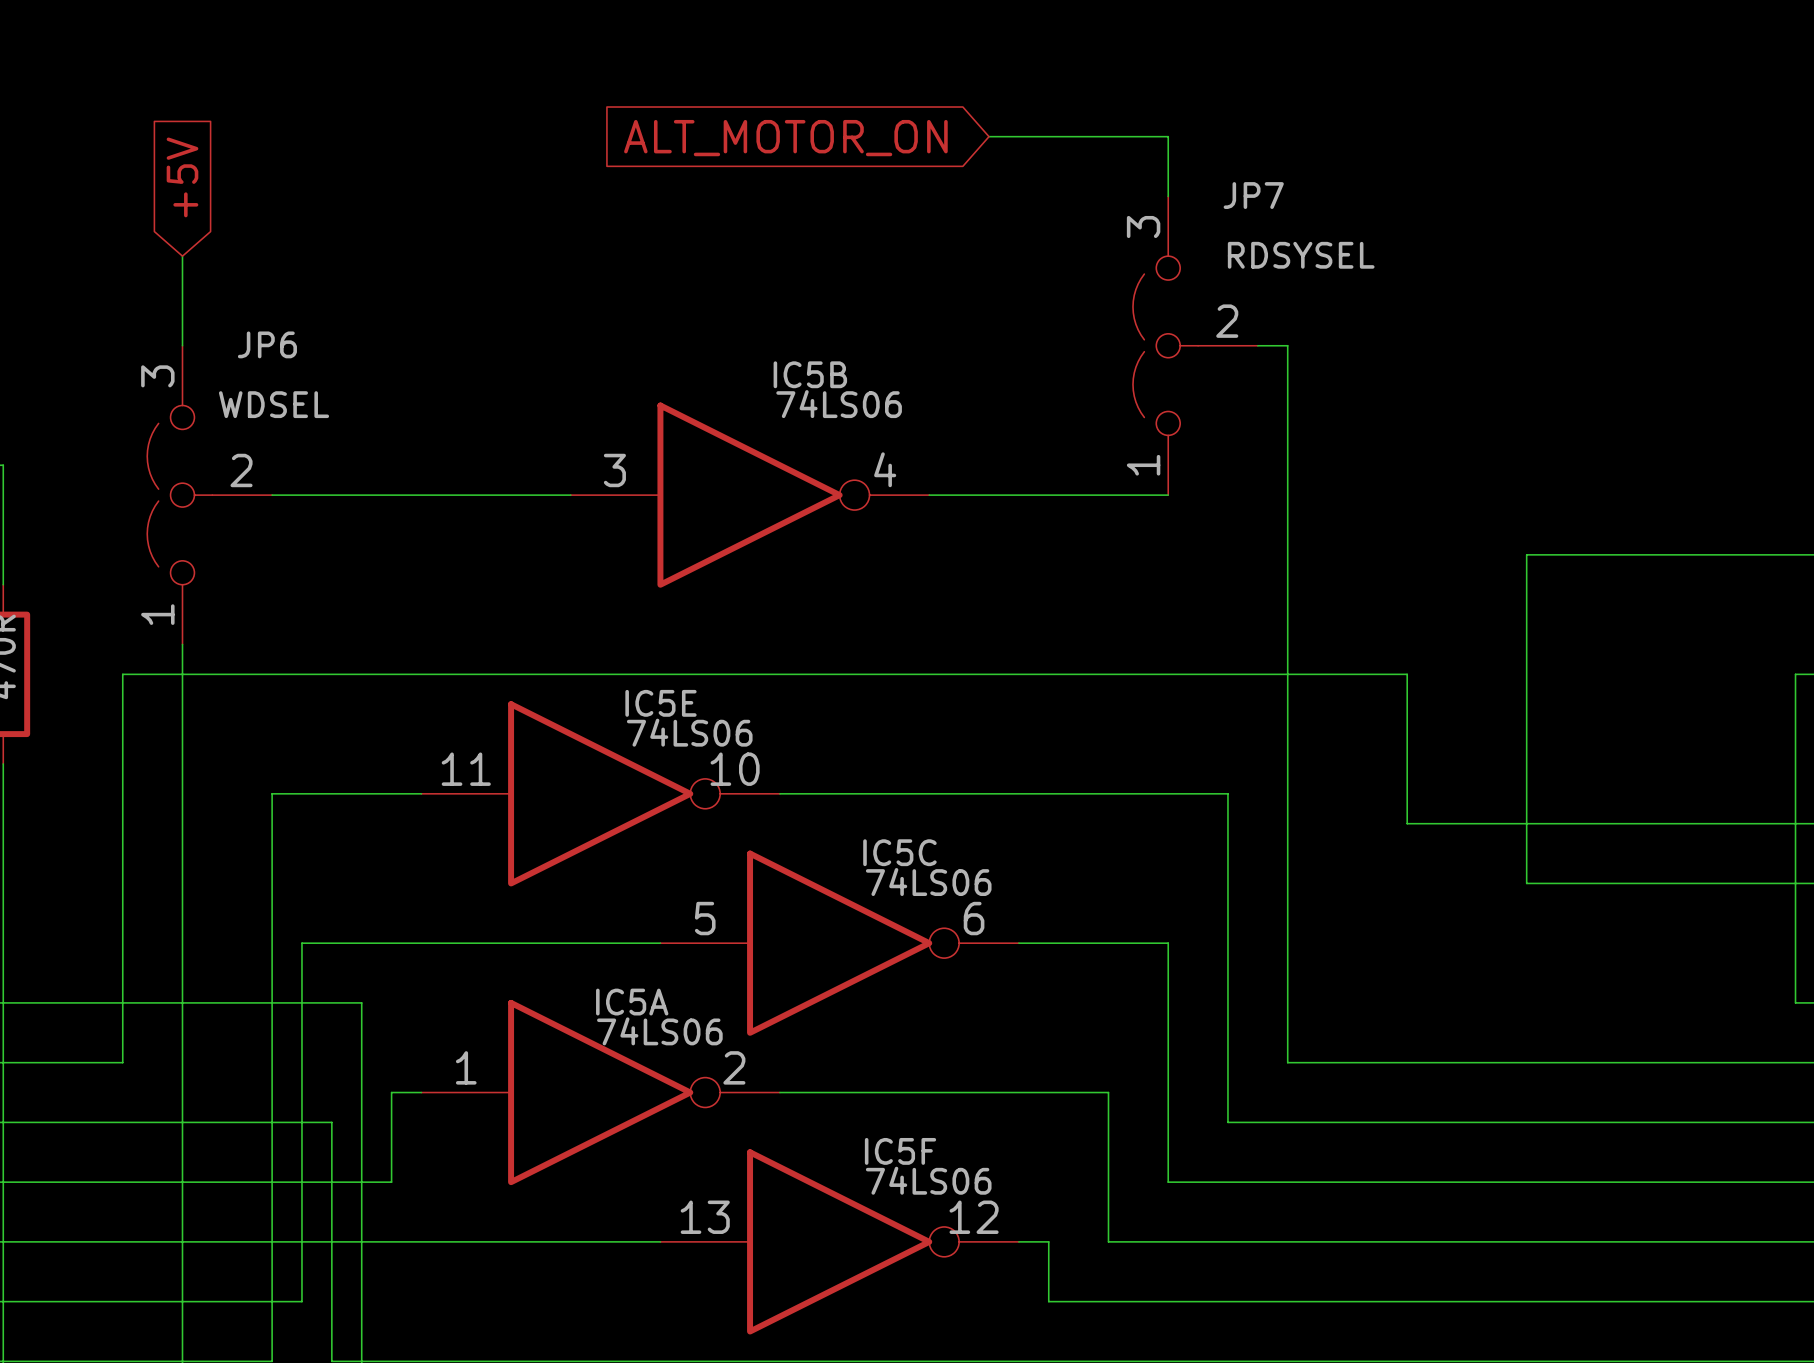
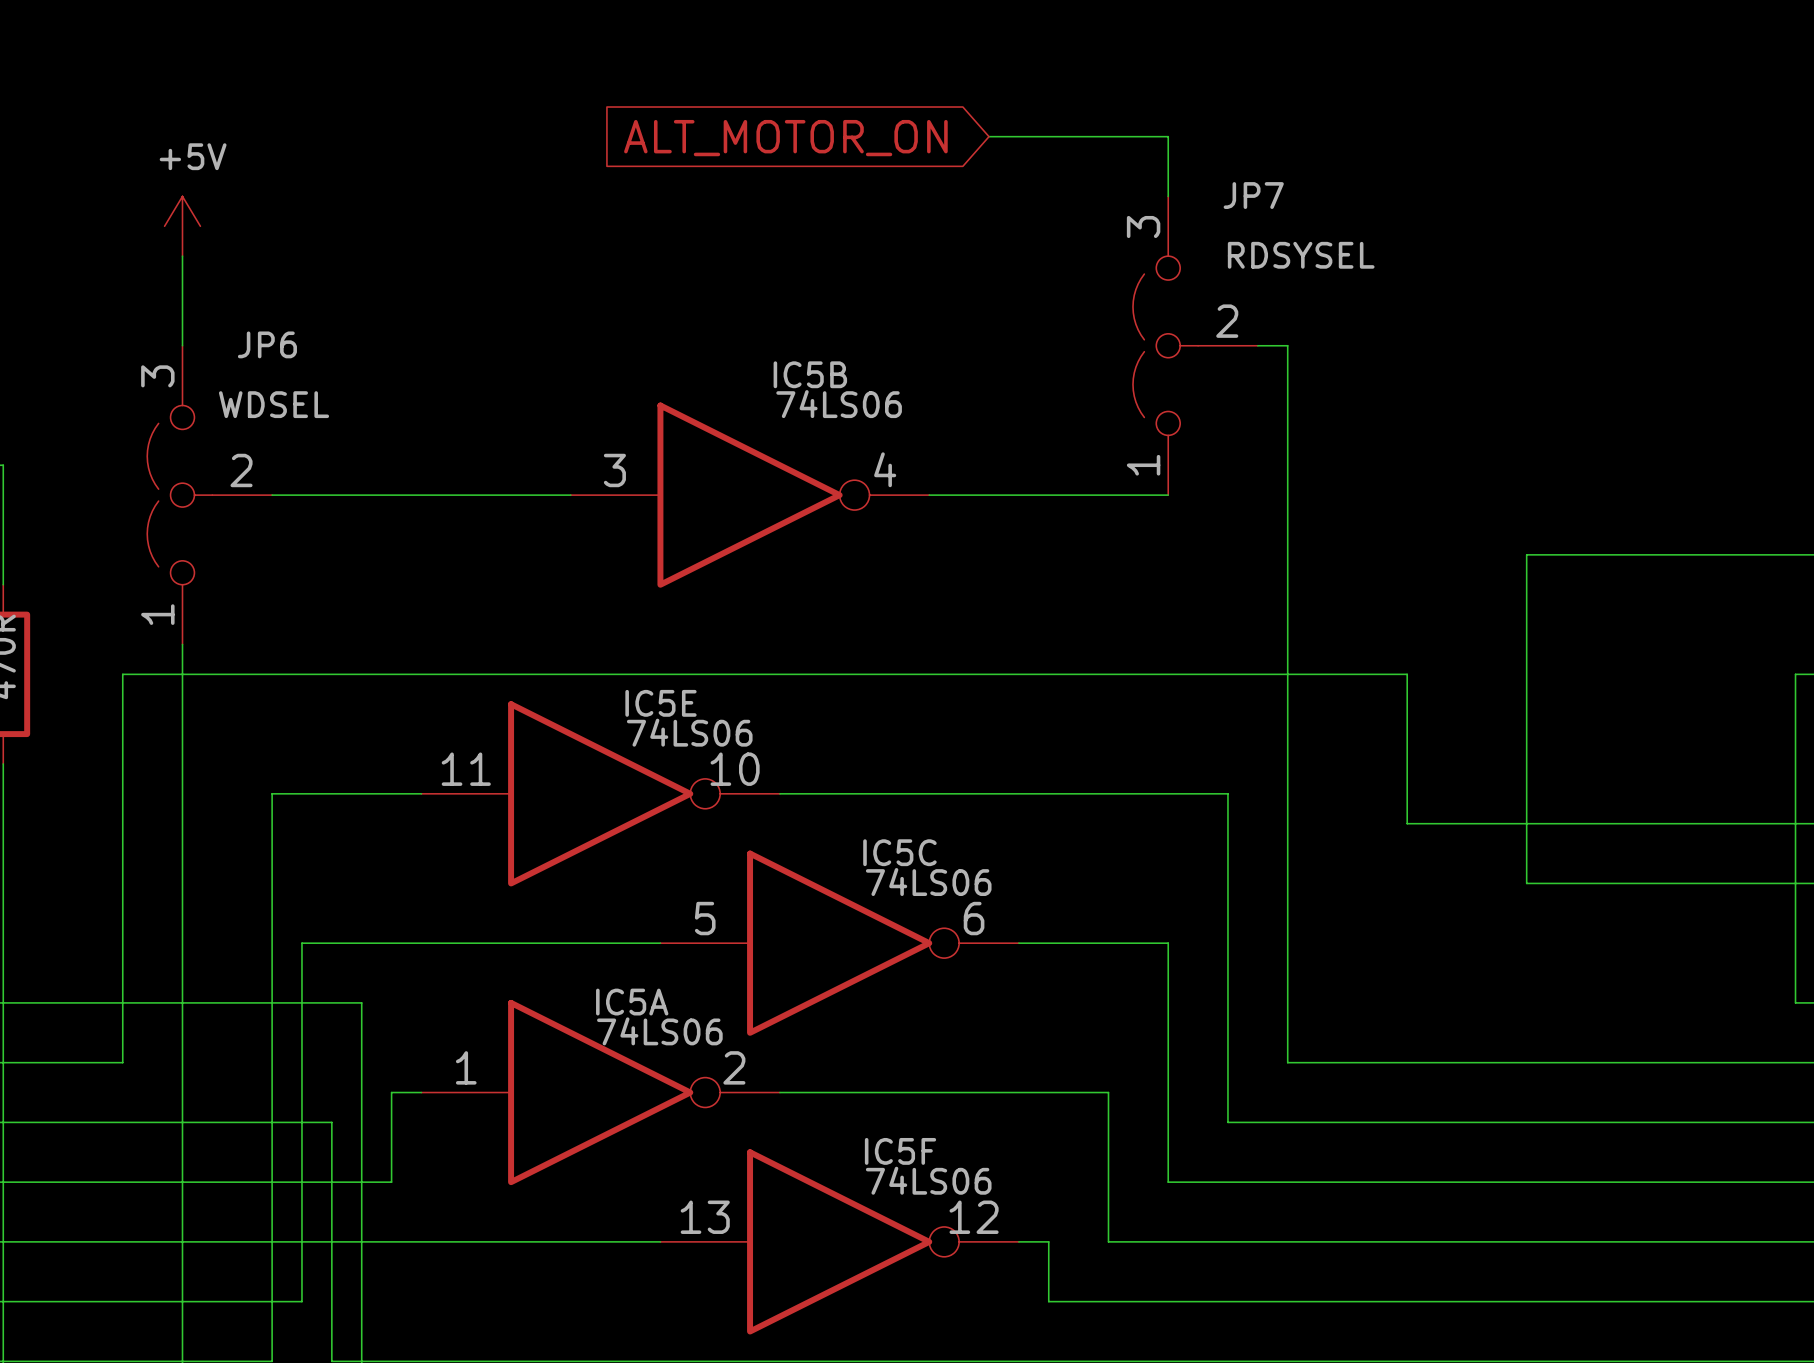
global label: +5V (182, 177) -> none
power symbol: none -> +5V (182, 226)

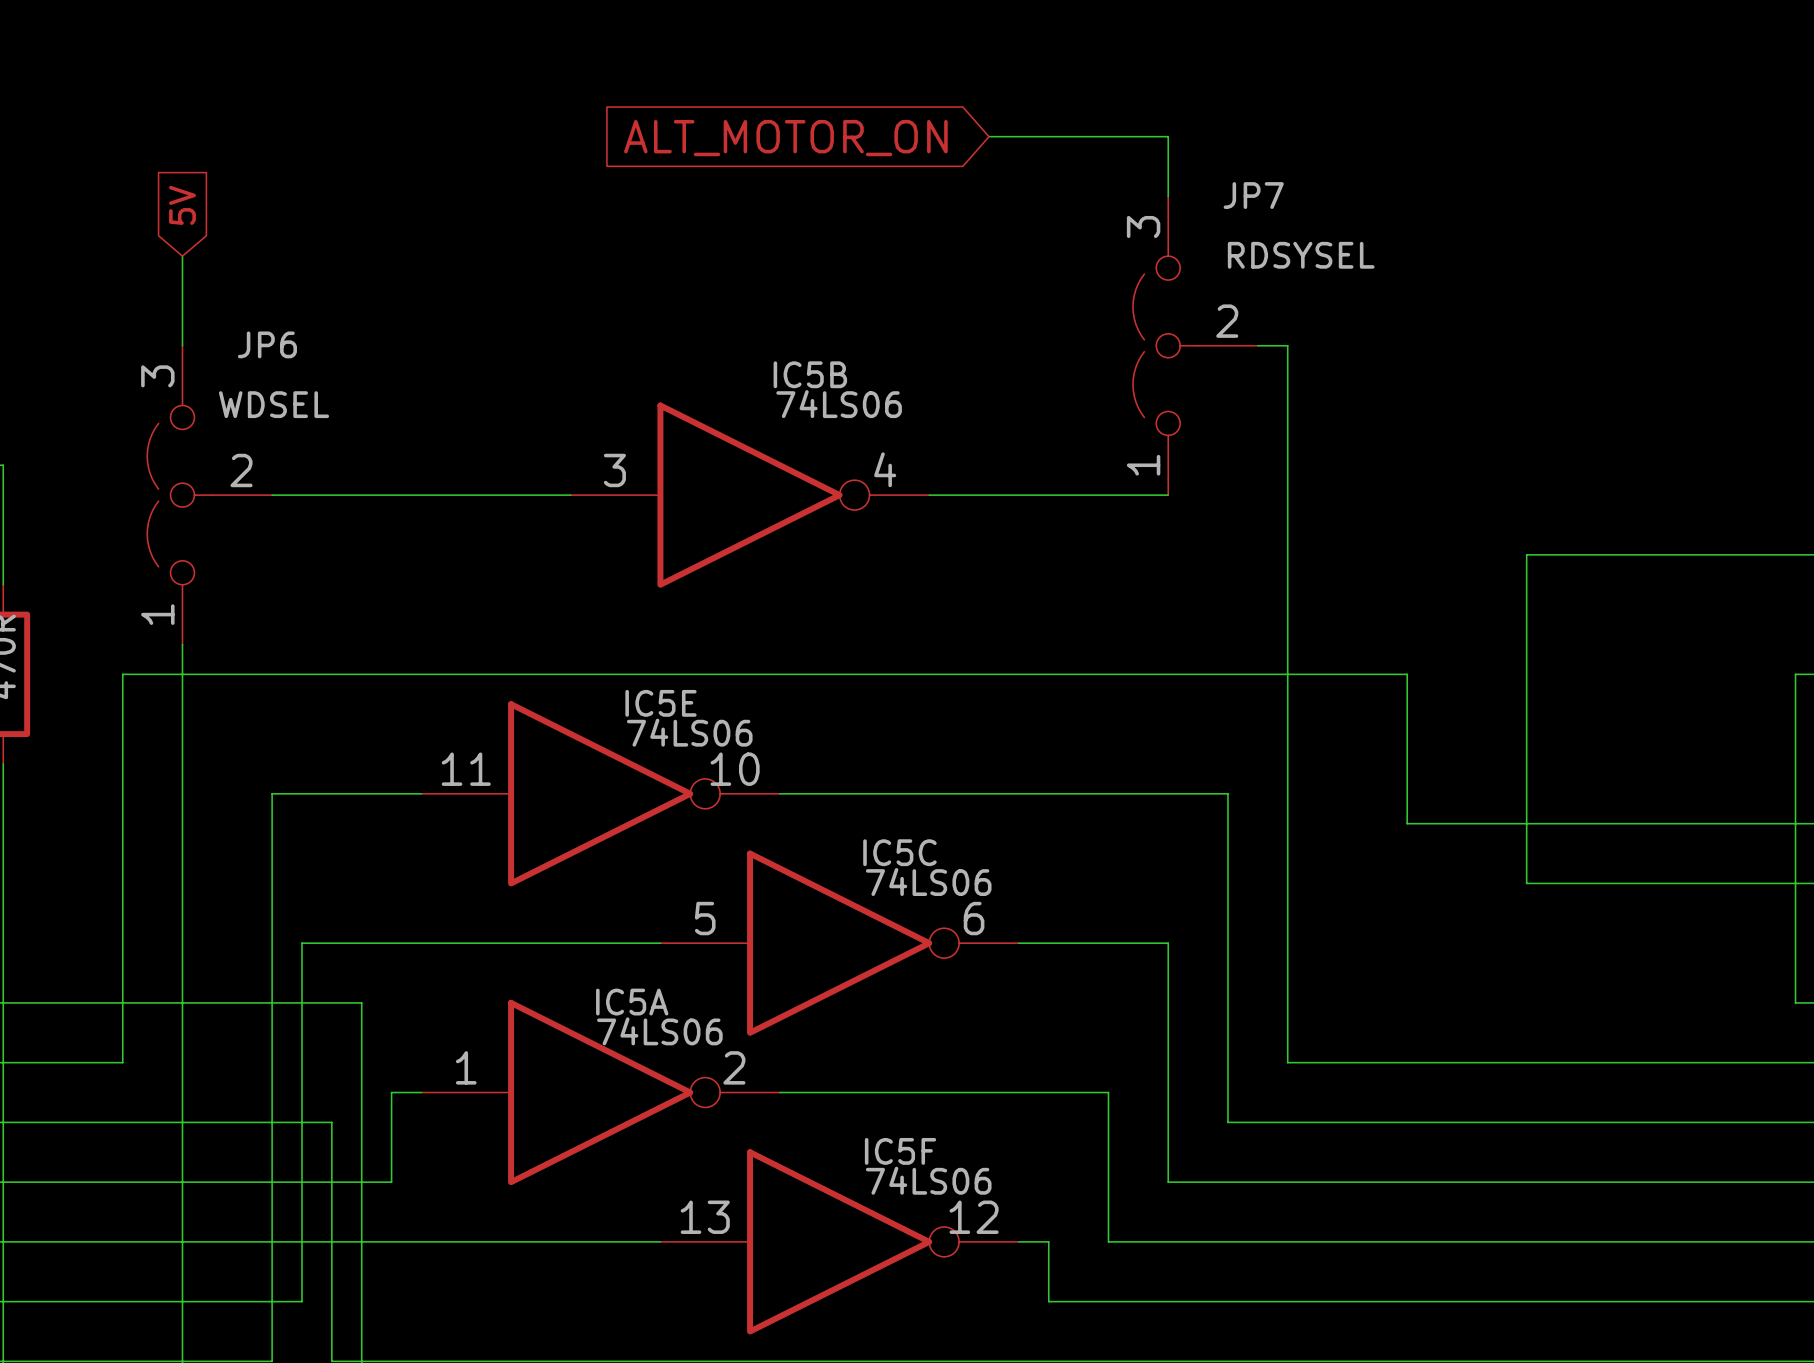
global label: none -> 5V (182, 205)
power symbol: +5V (182, 226) -> none

